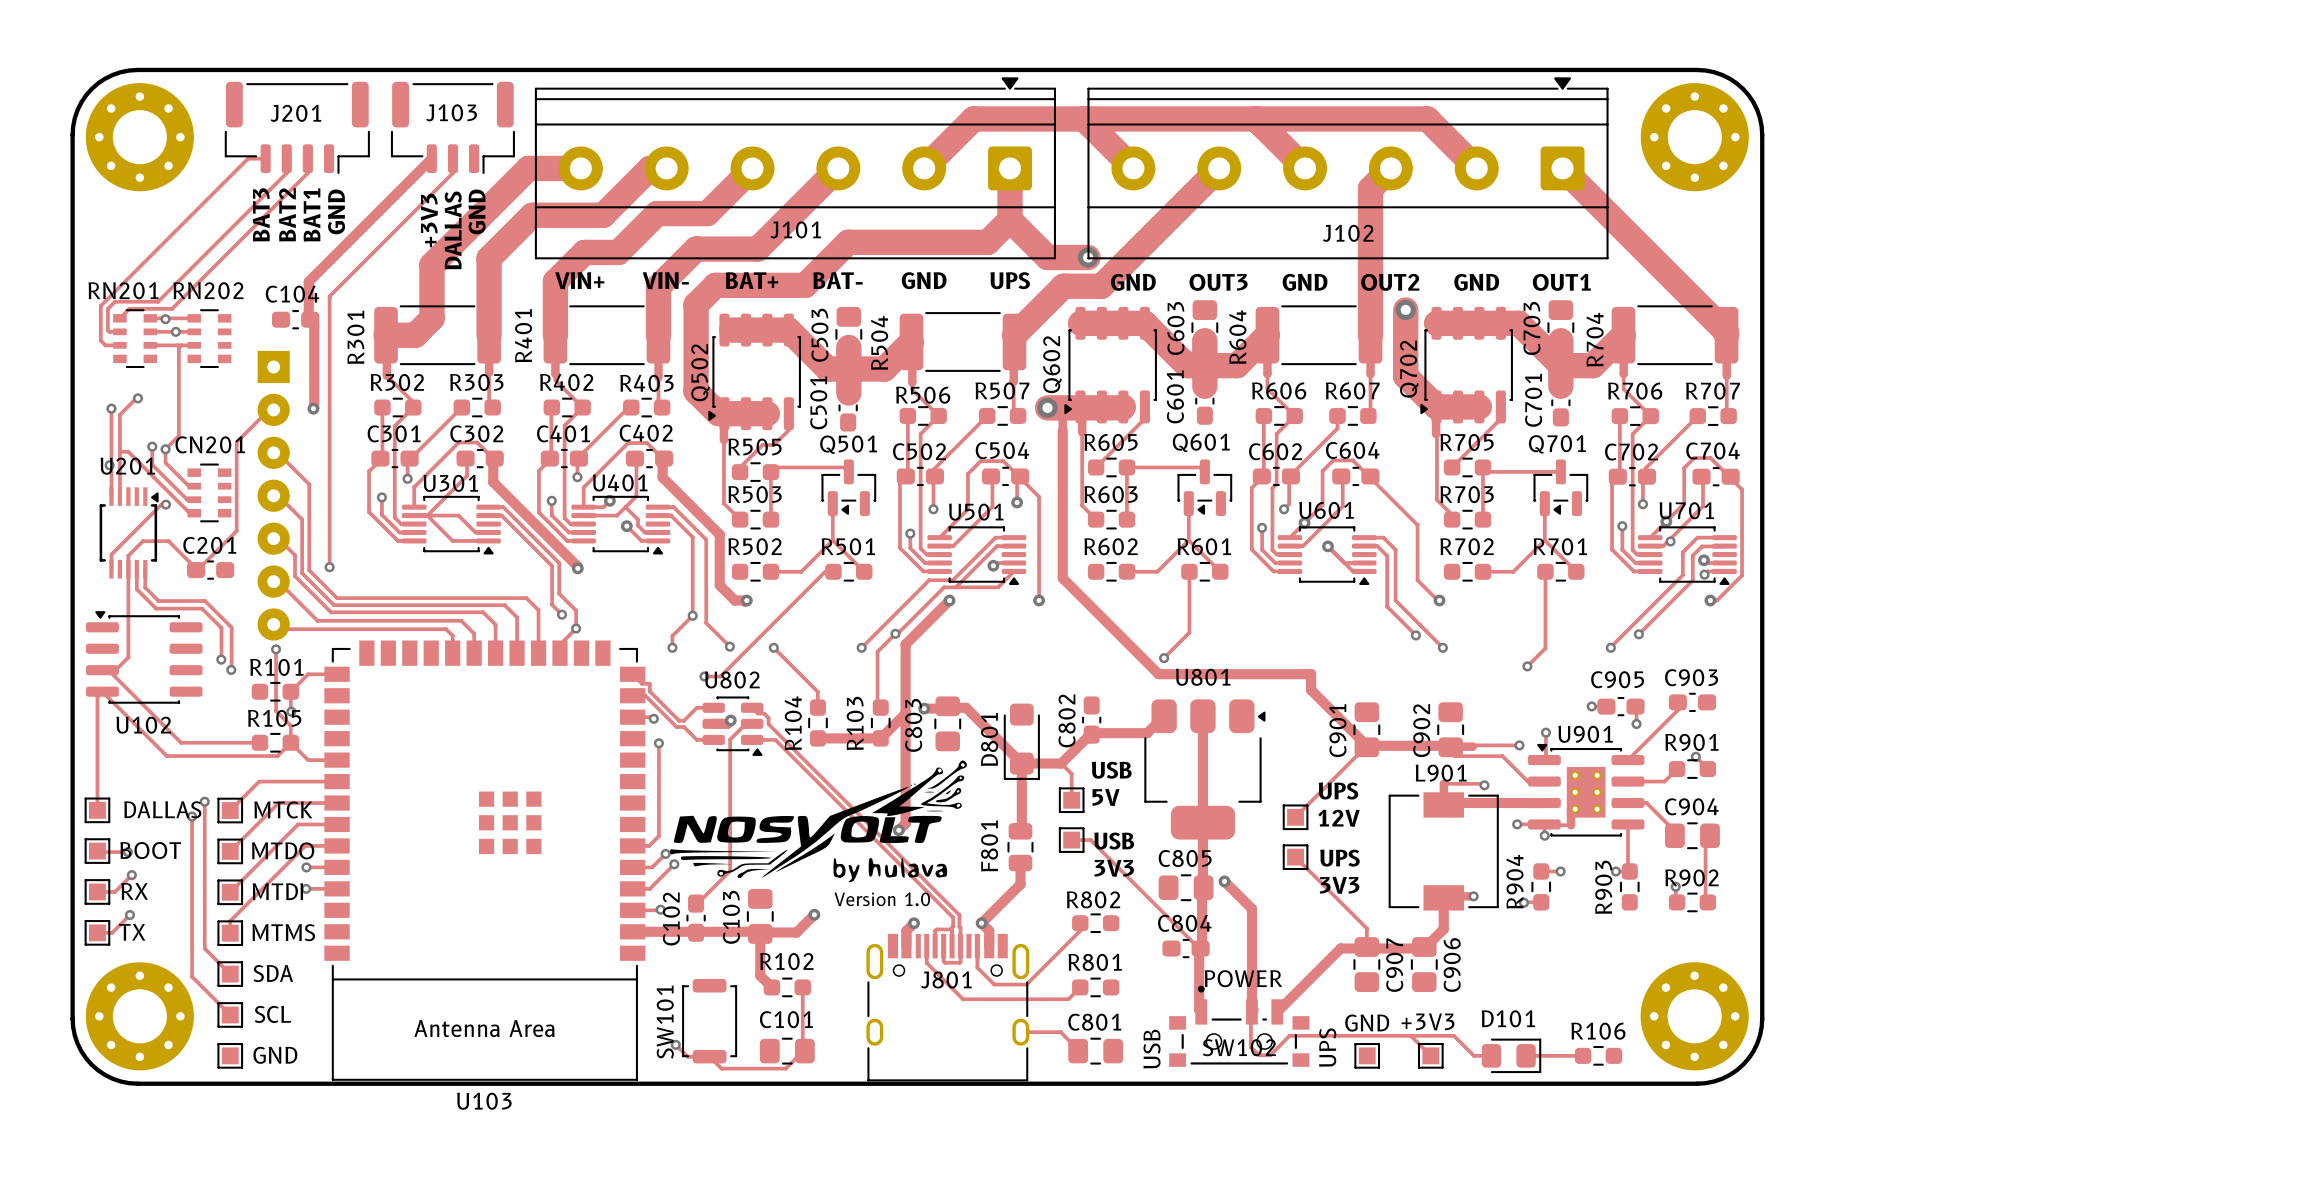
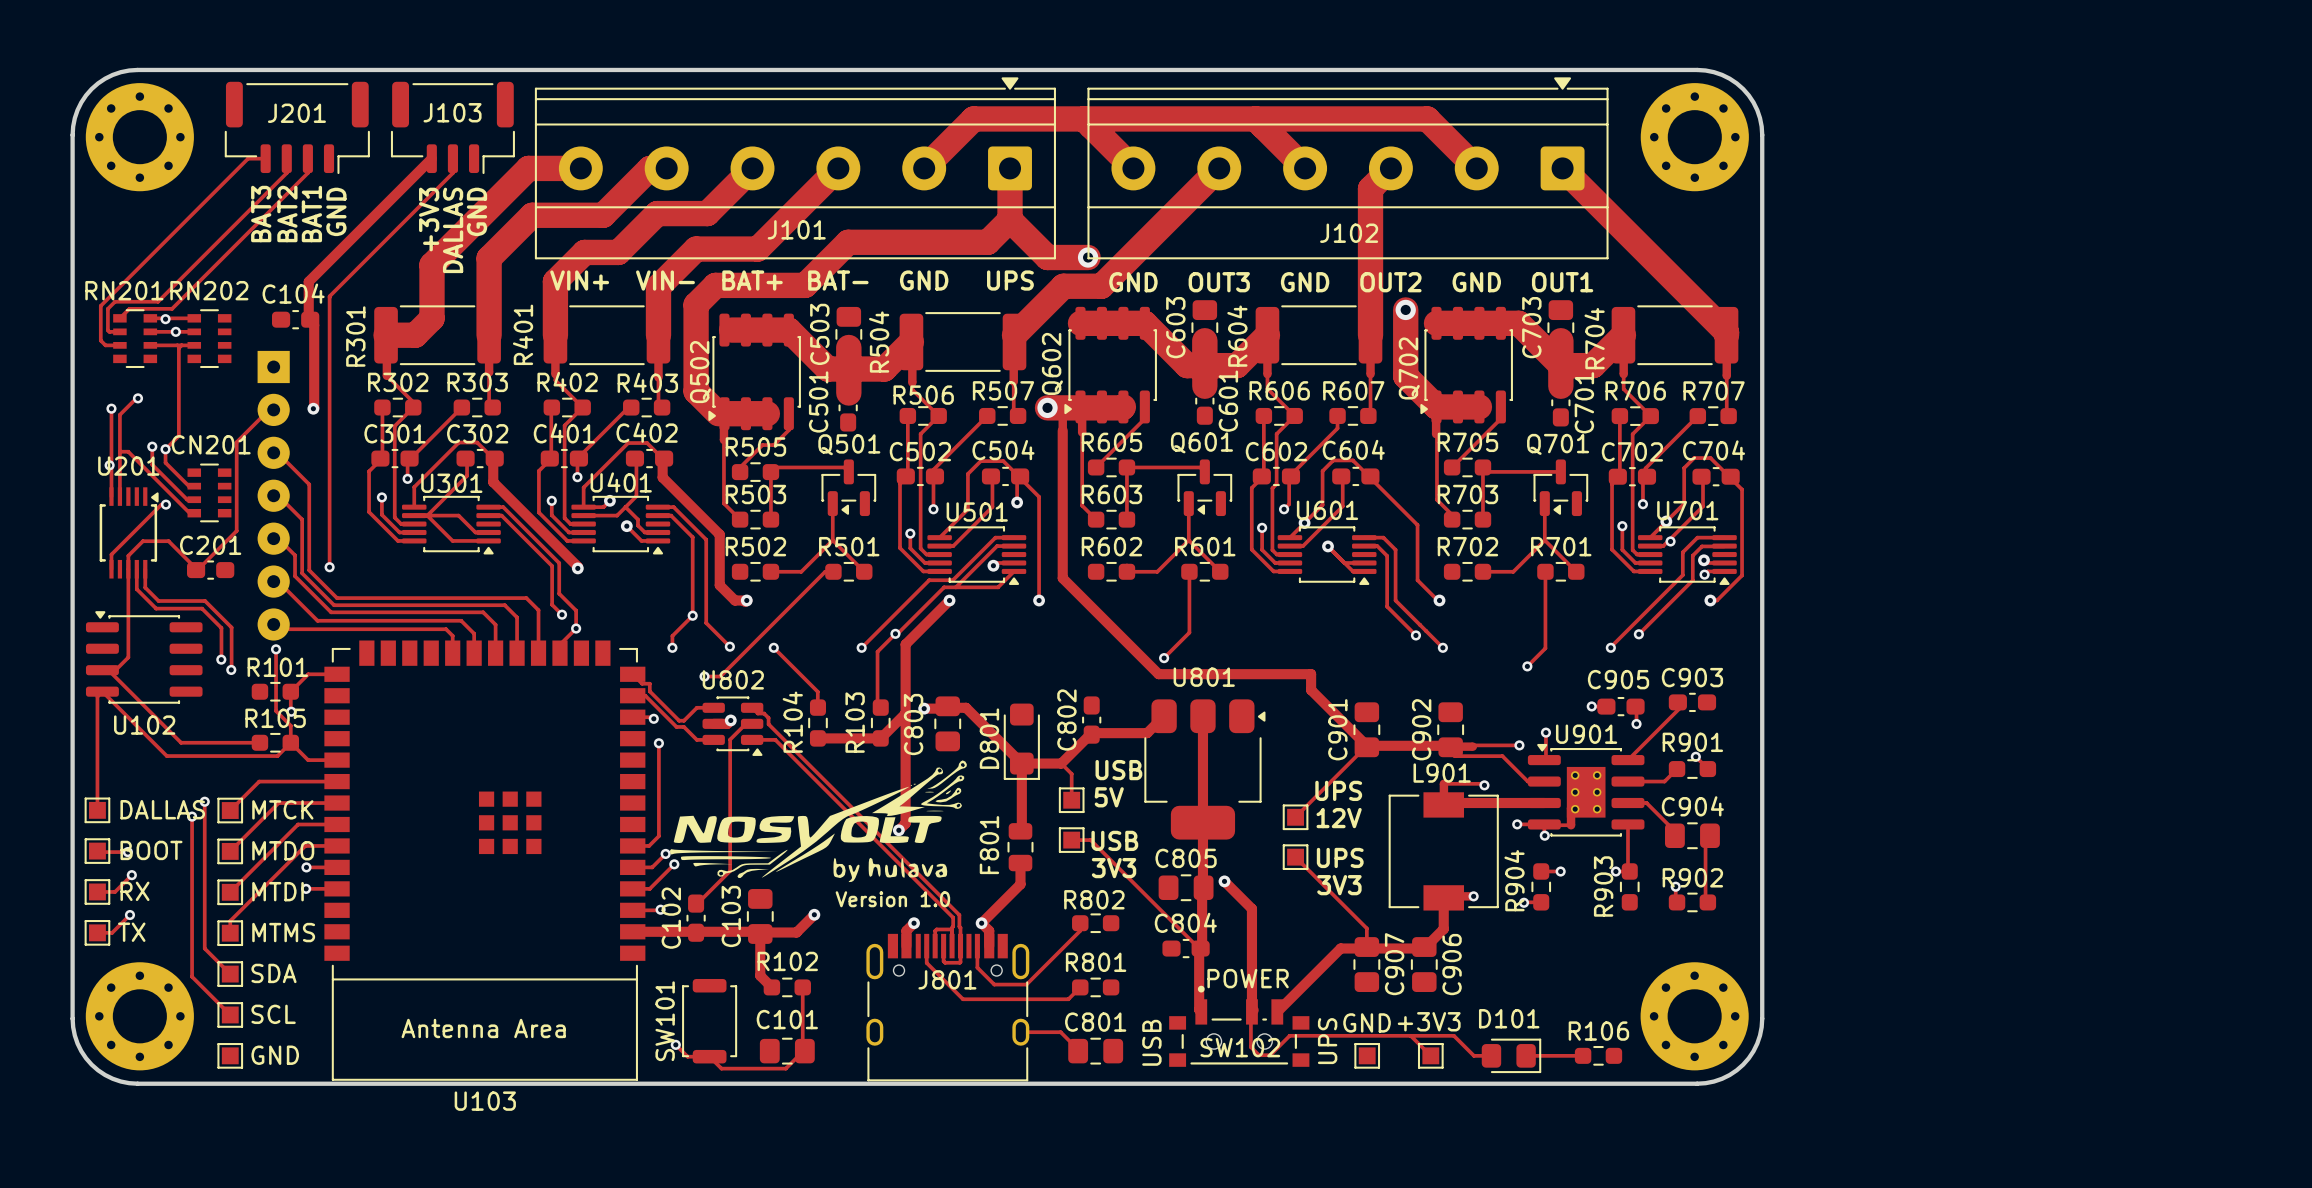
C601 name position: C601 (1175, 396) -> C601 (1228, 401)
C701 name position: C701 (1533, 400) -> C701 (1584, 402)

